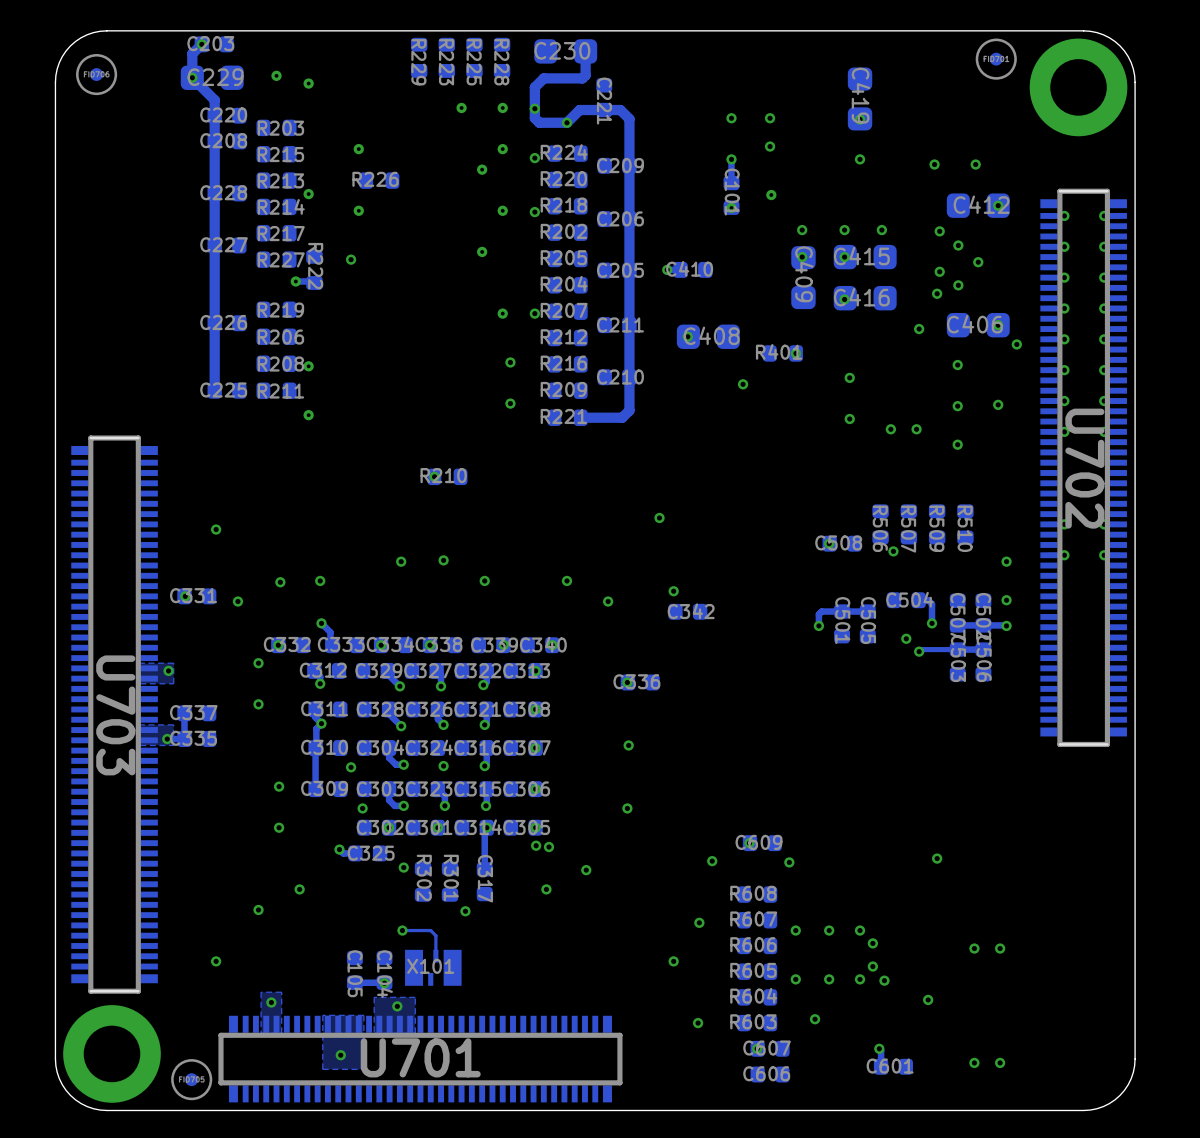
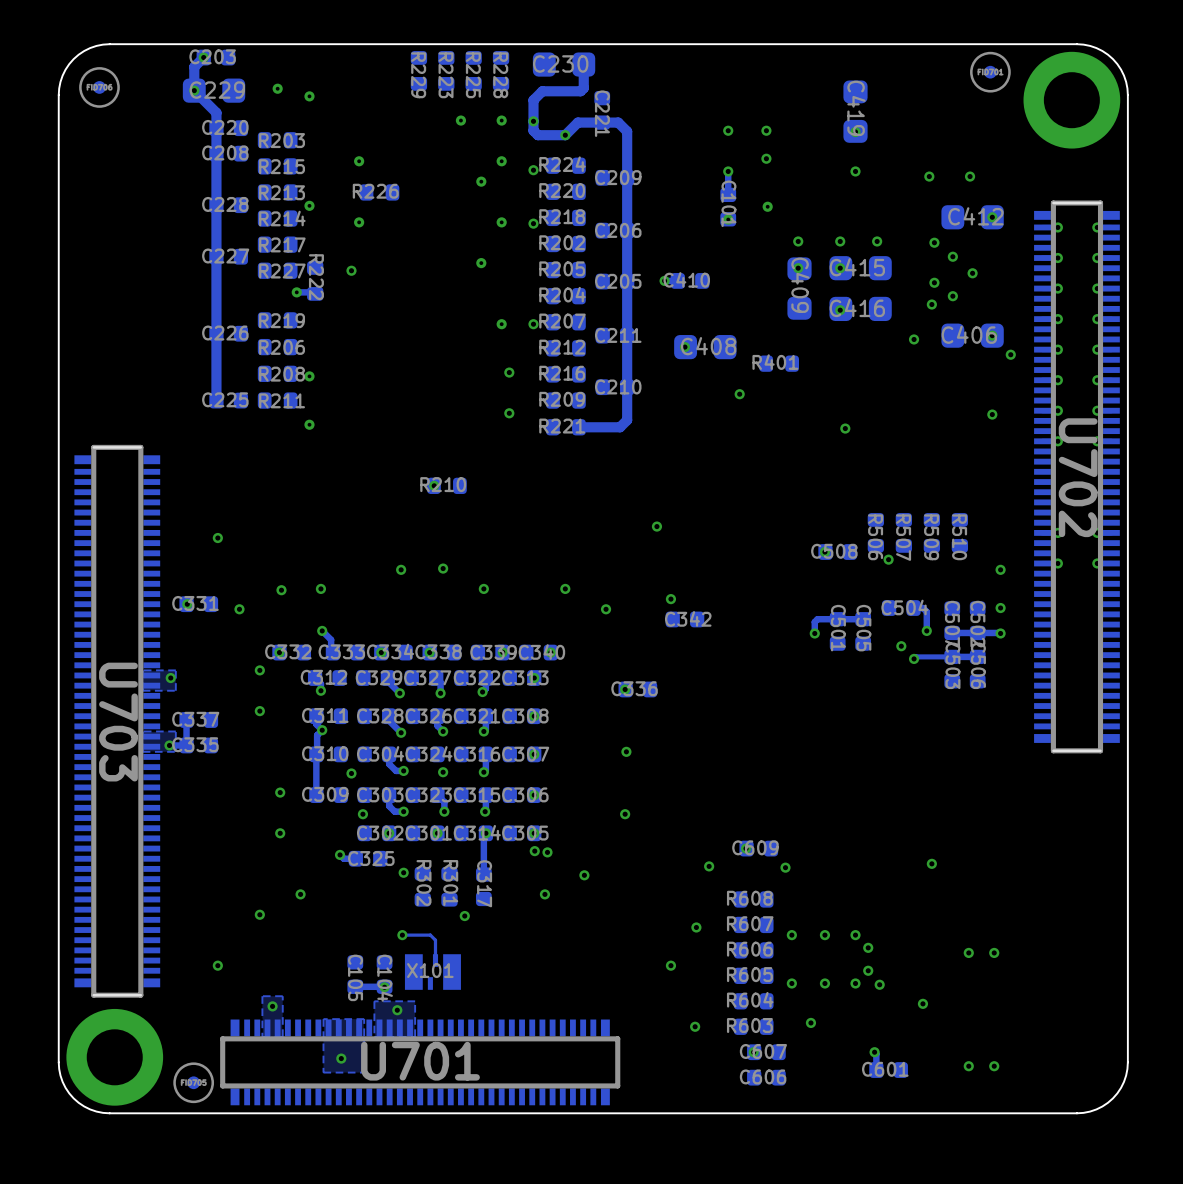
via: (796, 353) -> none
via: (957, 365) -> none
via: (849, 377) -> none
via: (957, 406) -> none
via: (890, 429) -> none
via: (916, 429) -> none
via: (957, 444) -> none

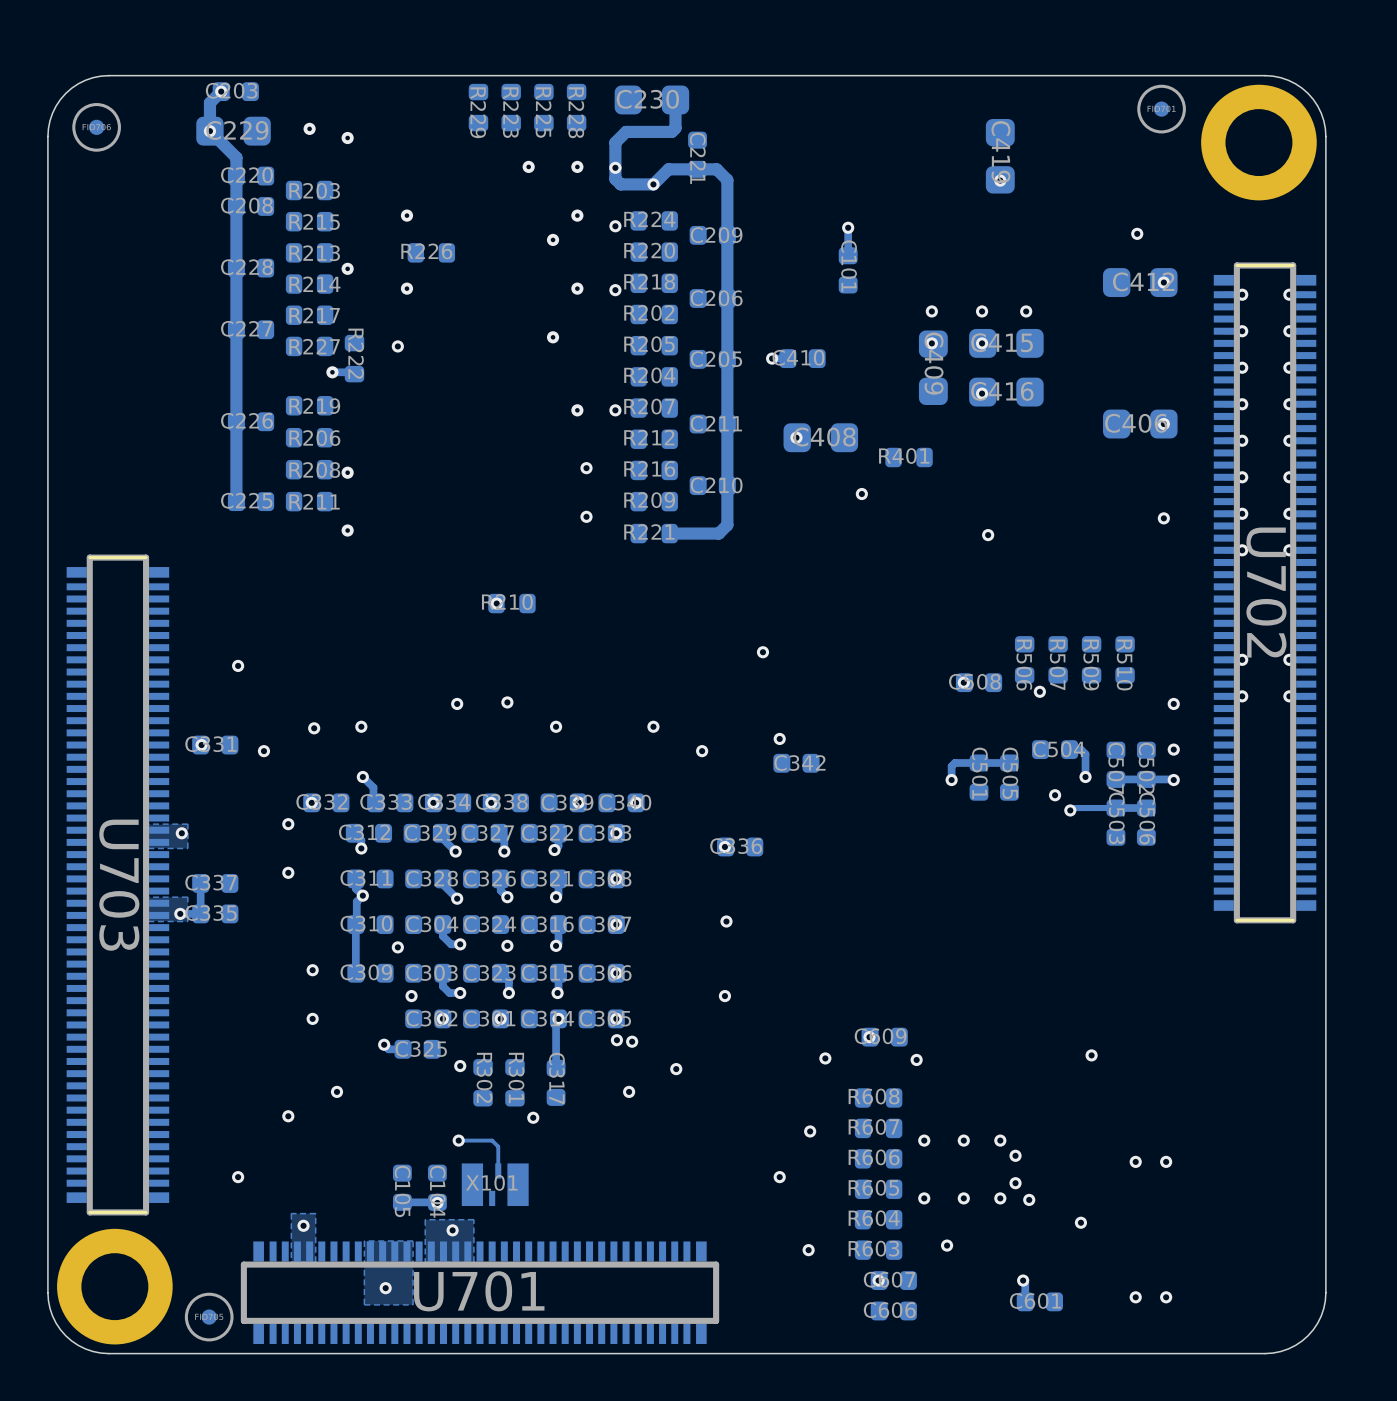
via: (728, 130) -> none
via: (766, 130) -> none
via: (766, 158) -> none
via: (855, 171) -> none
via: (929, 176) -> none
via: (767, 206) -> none
via: (728, 219) -> none
via: (934, 242) -> none
via: (952, 256) -> none
via: (972, 273) -> none
via: (934, 282) -> none
via: (952, 296) -> none
via: (931, 304) -> none
via: (914, 339) -> none
via: (1010, 354) -> none

